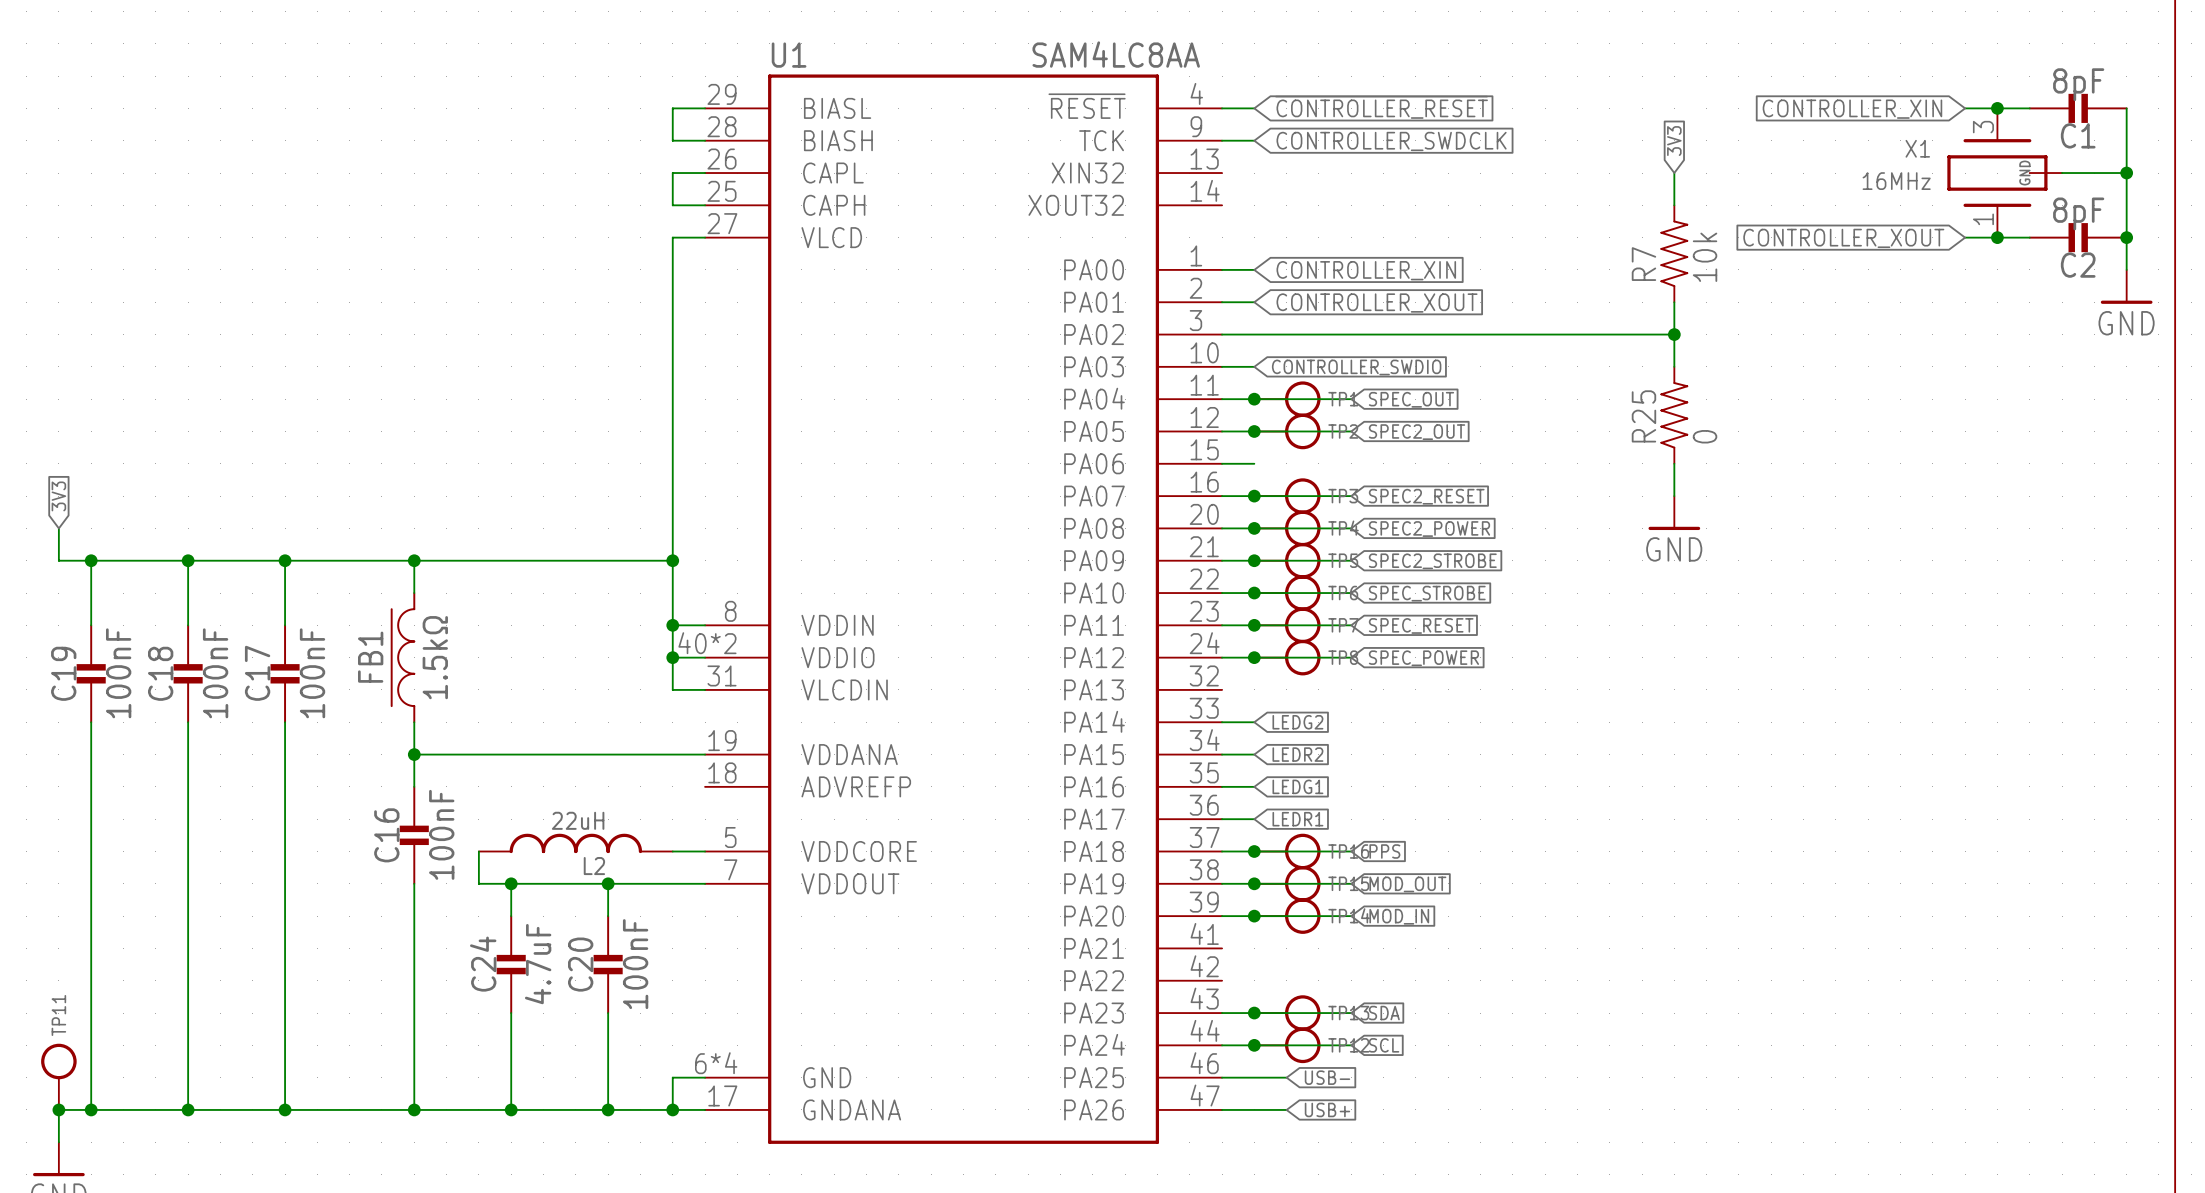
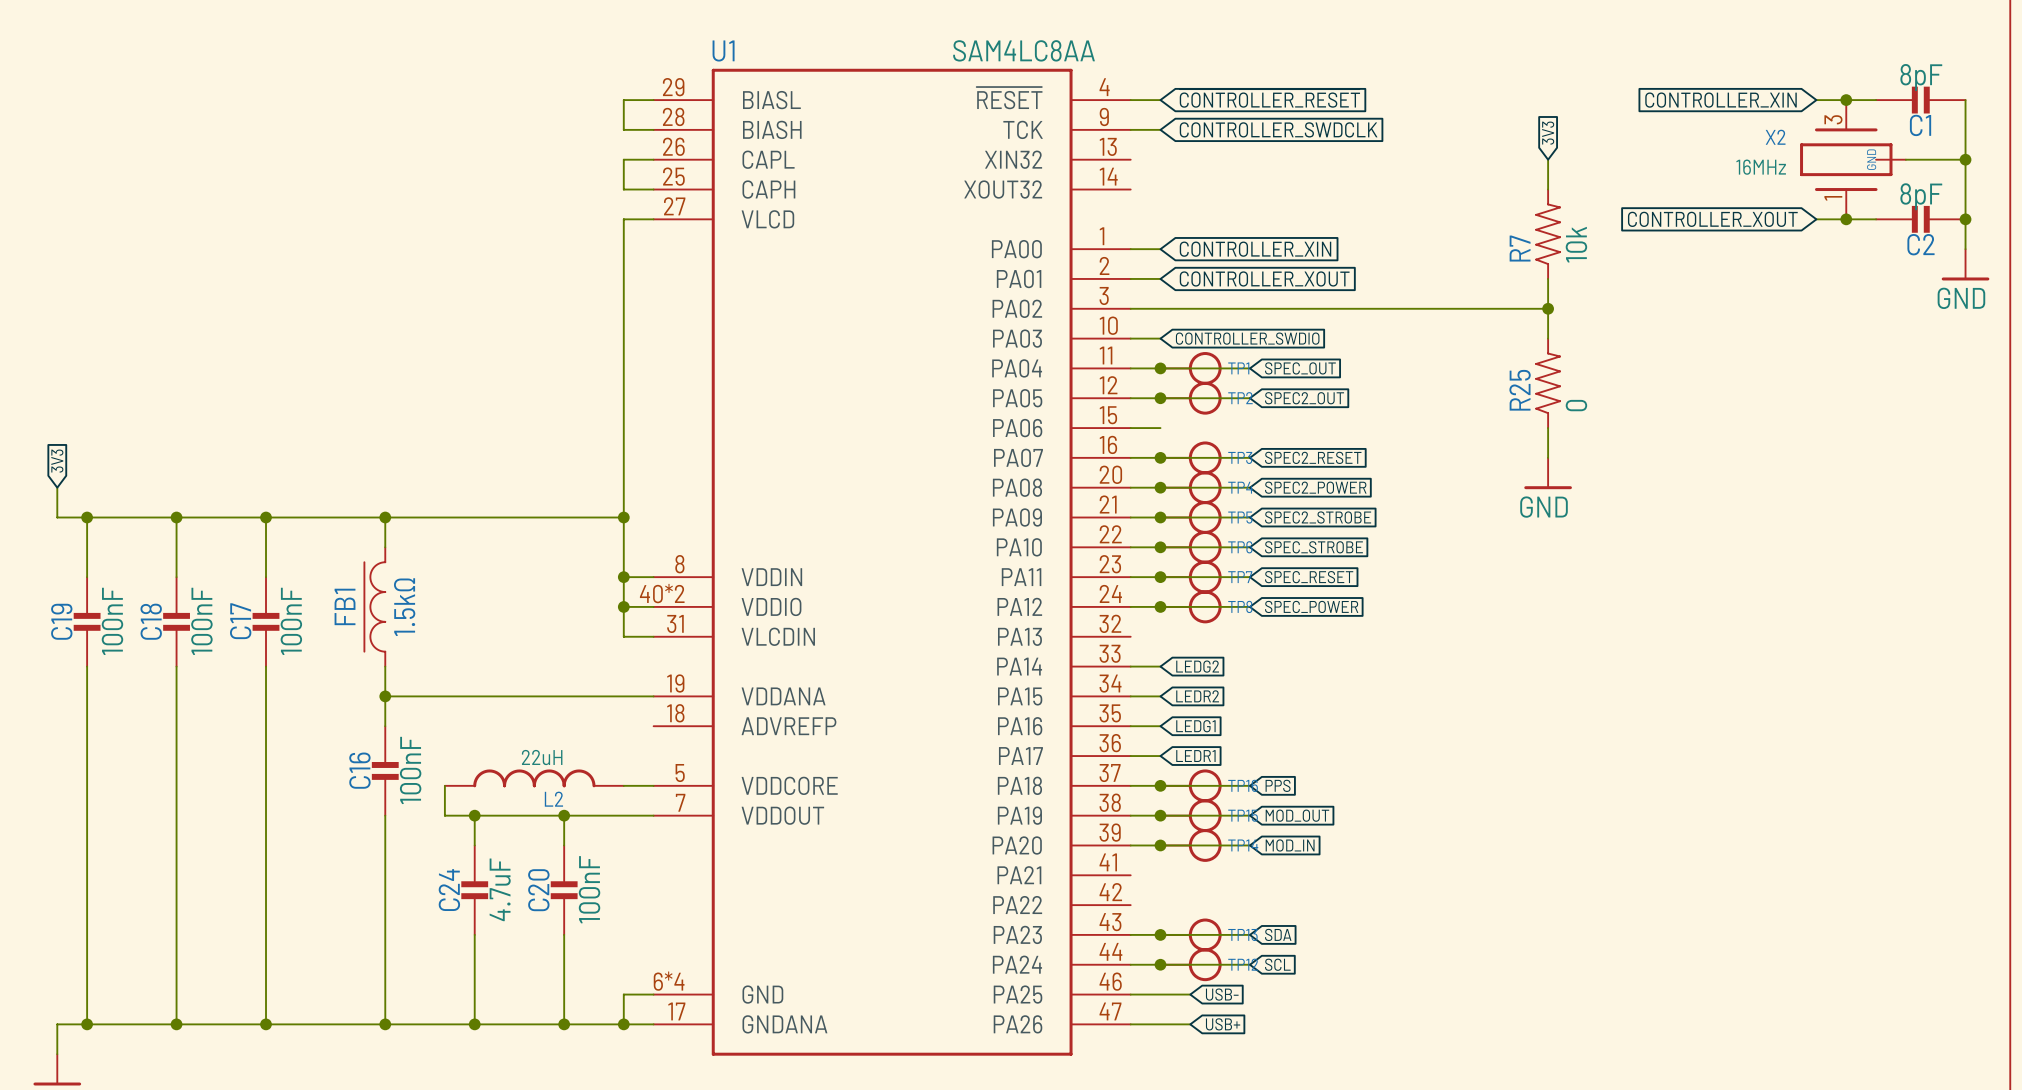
X1 name: X1 (1917, 148) -> X2 (1775, 137)
TP11: (58, 1076) -> none
junction: (58, 1109) -> none

